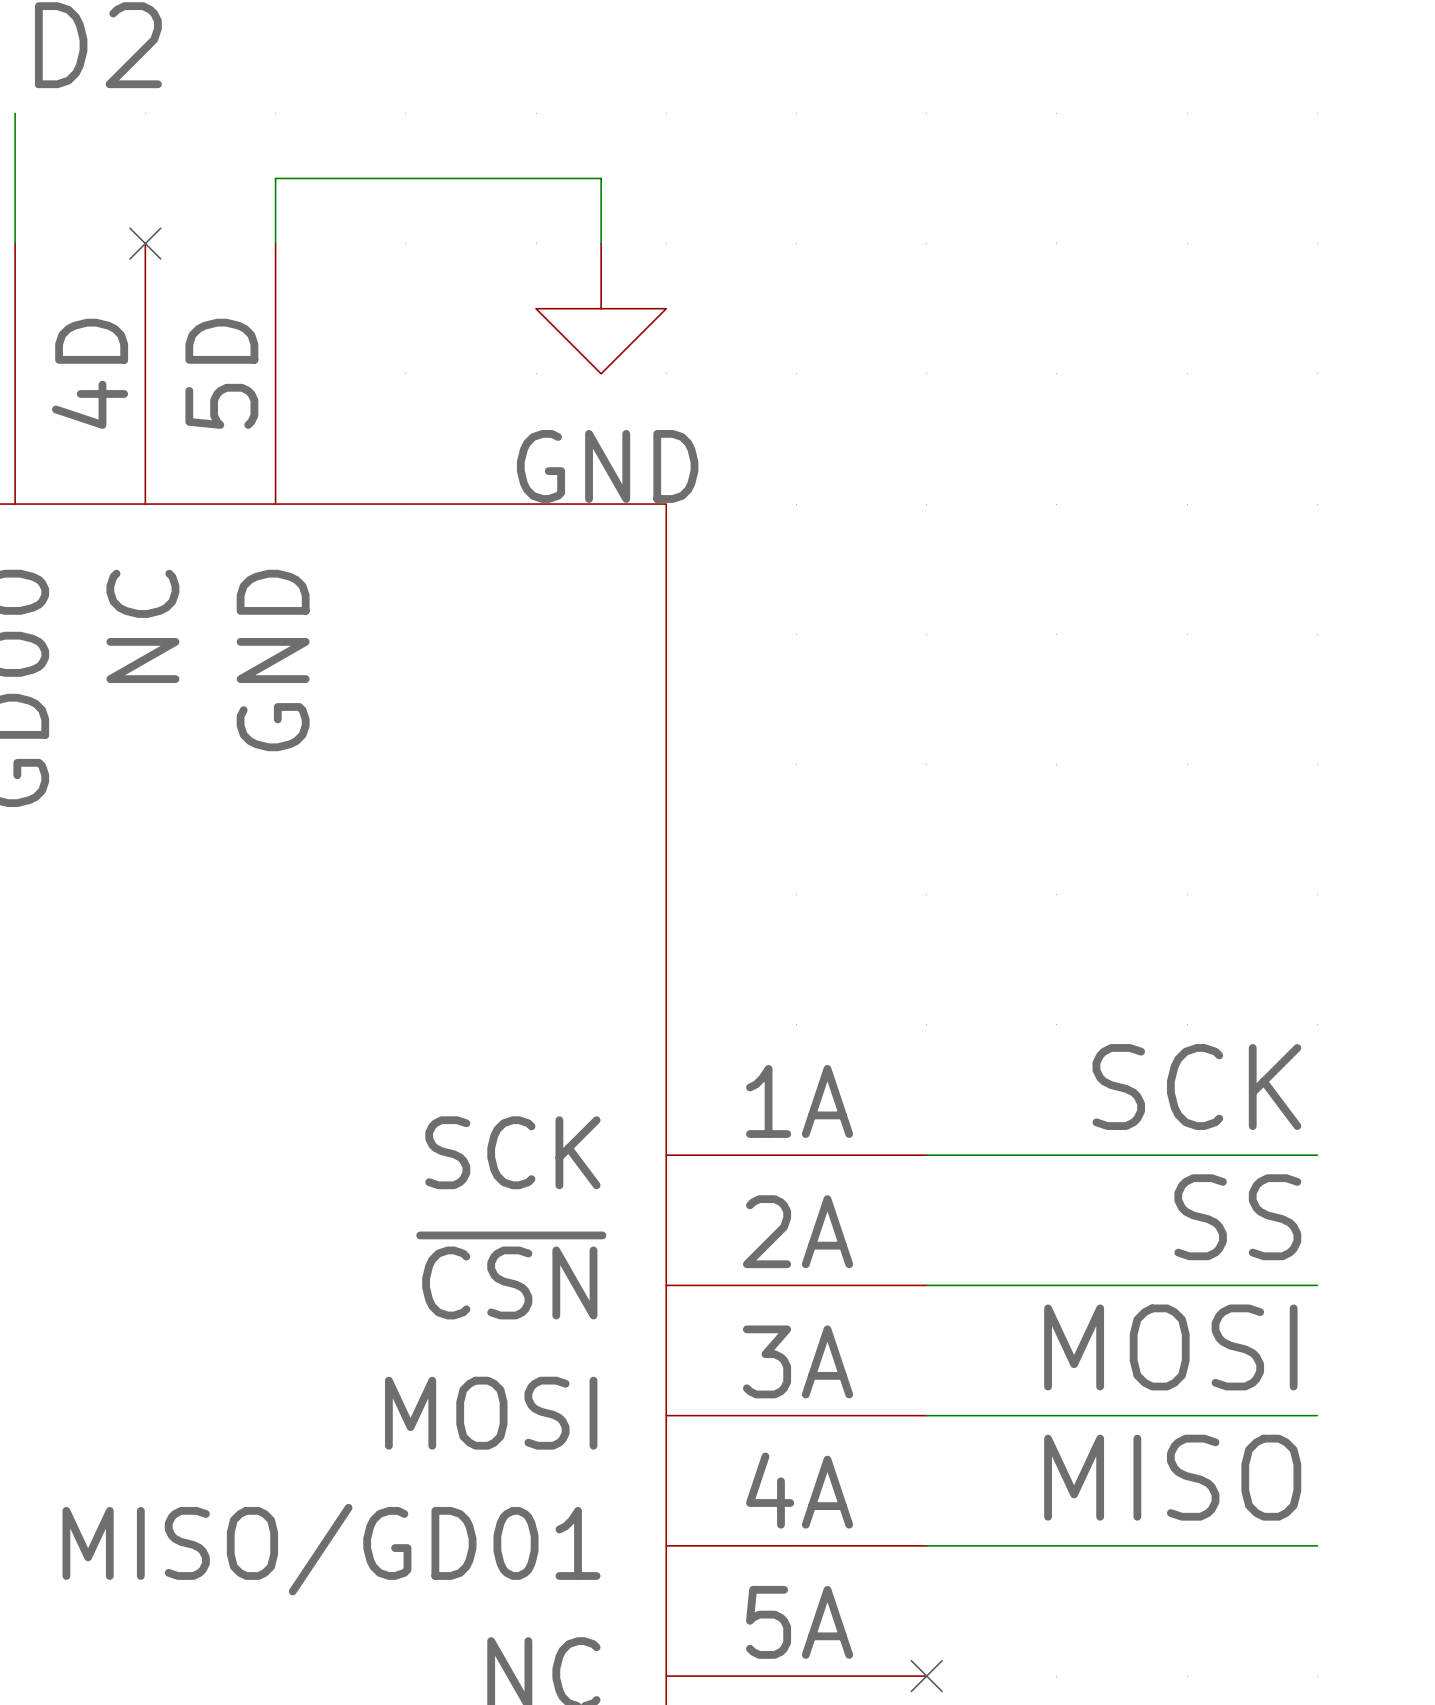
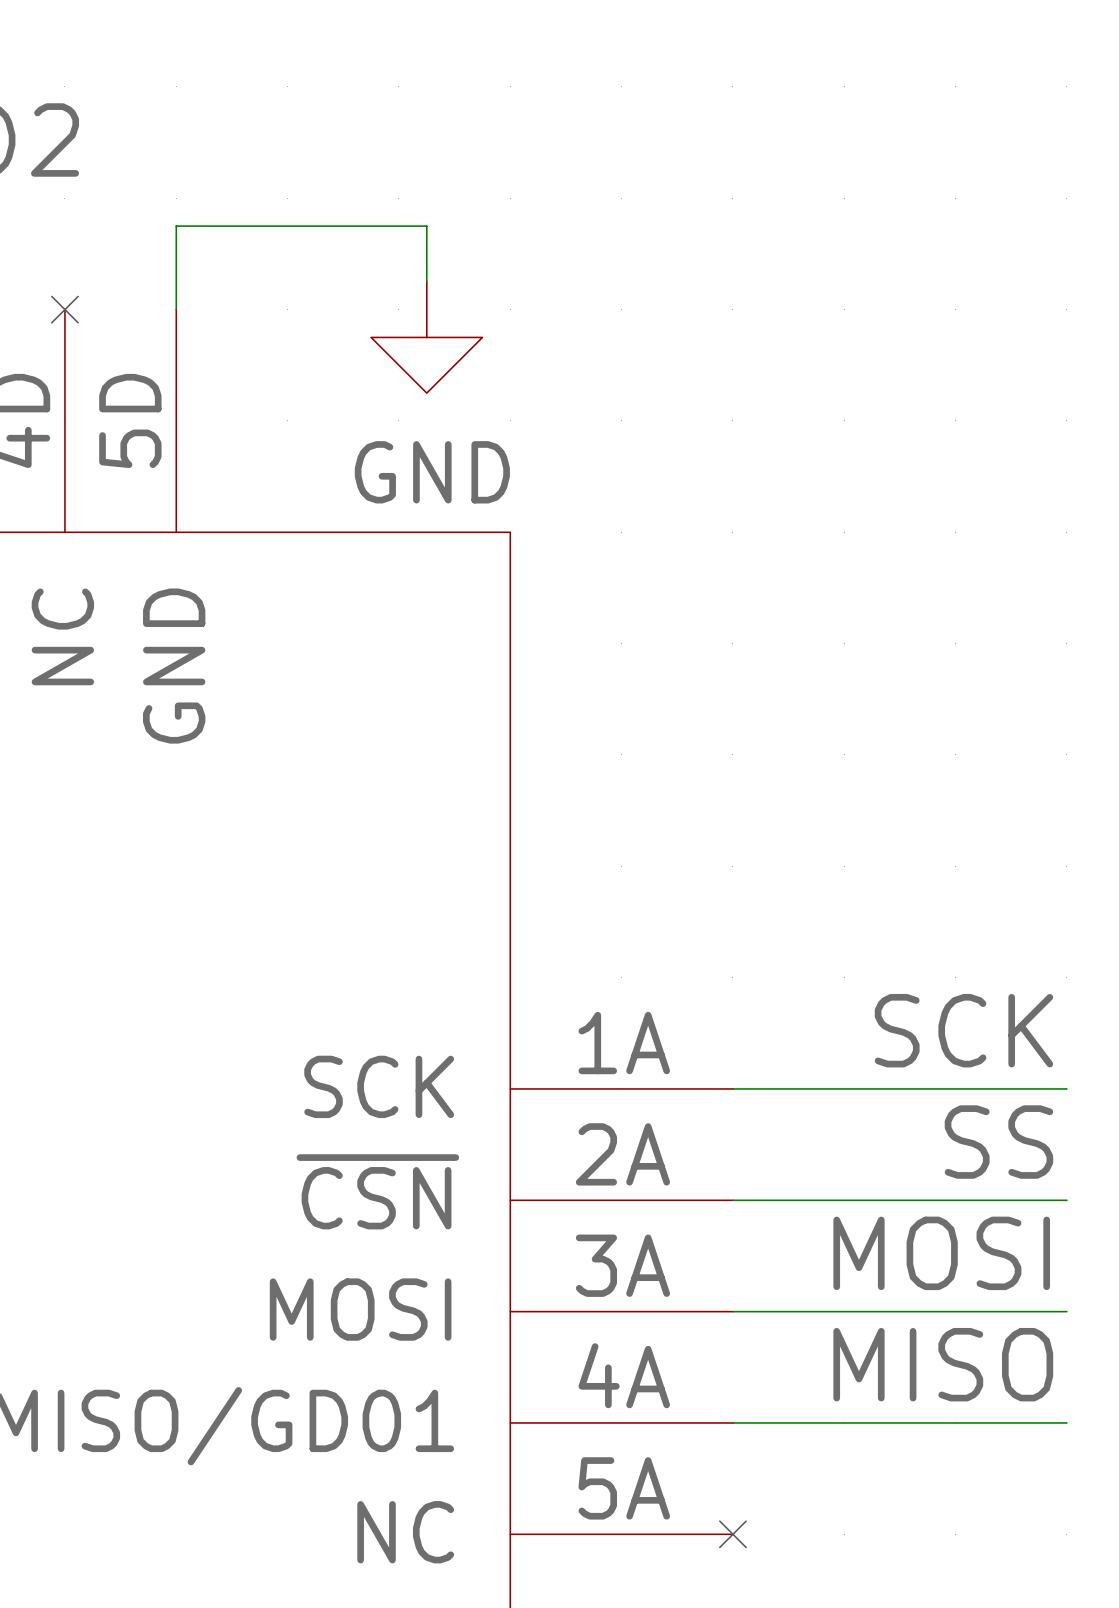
wire: (275, 178) (601, 178) (601, 243) -> (176, 253) (176, 226) (426, 226) (426, 281)
power symbol position: GND (601, 308) -> GND (426, 337)

